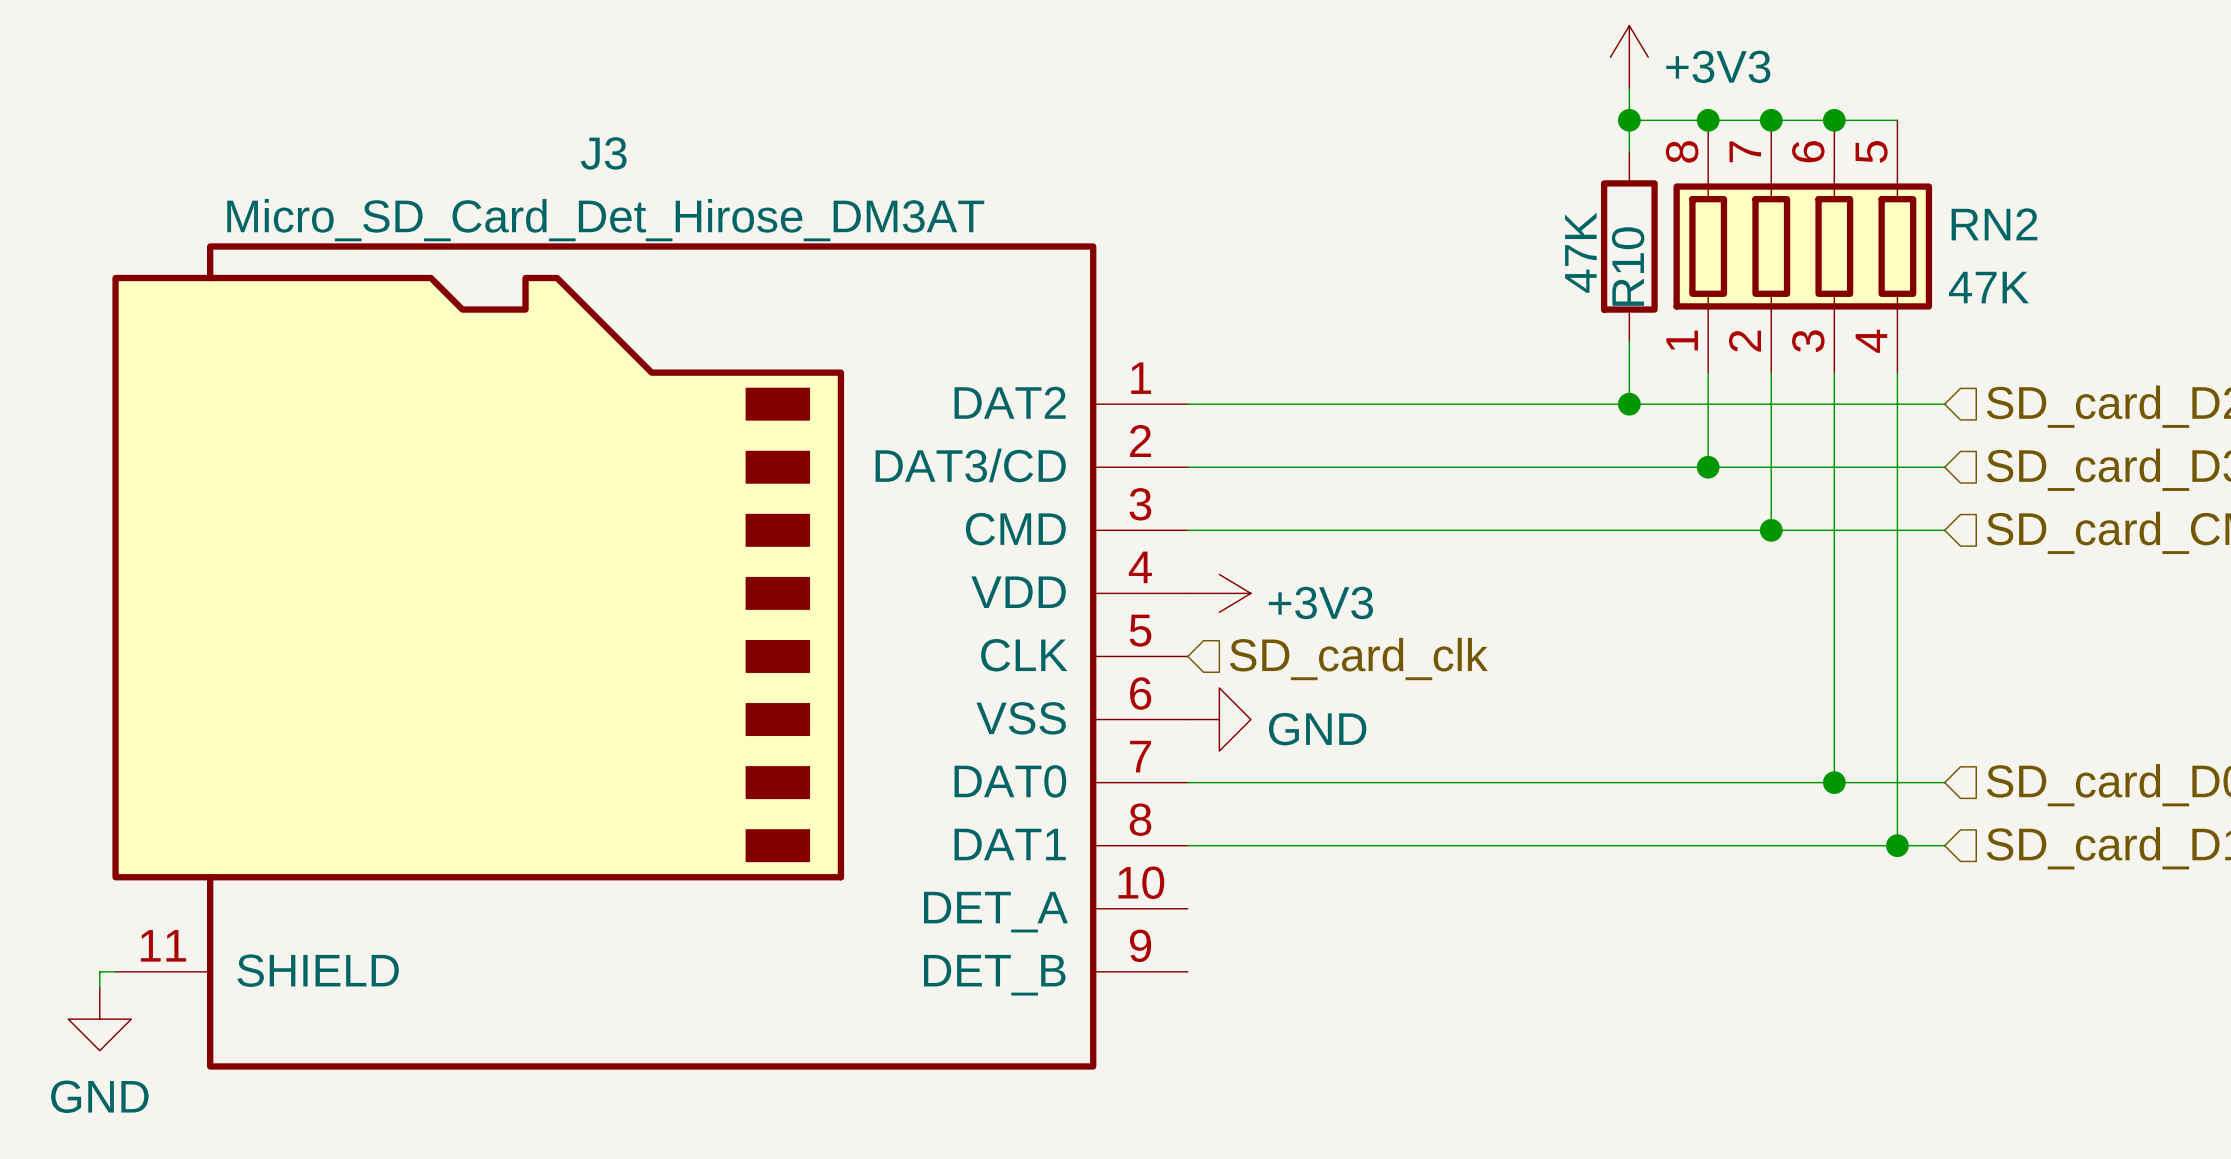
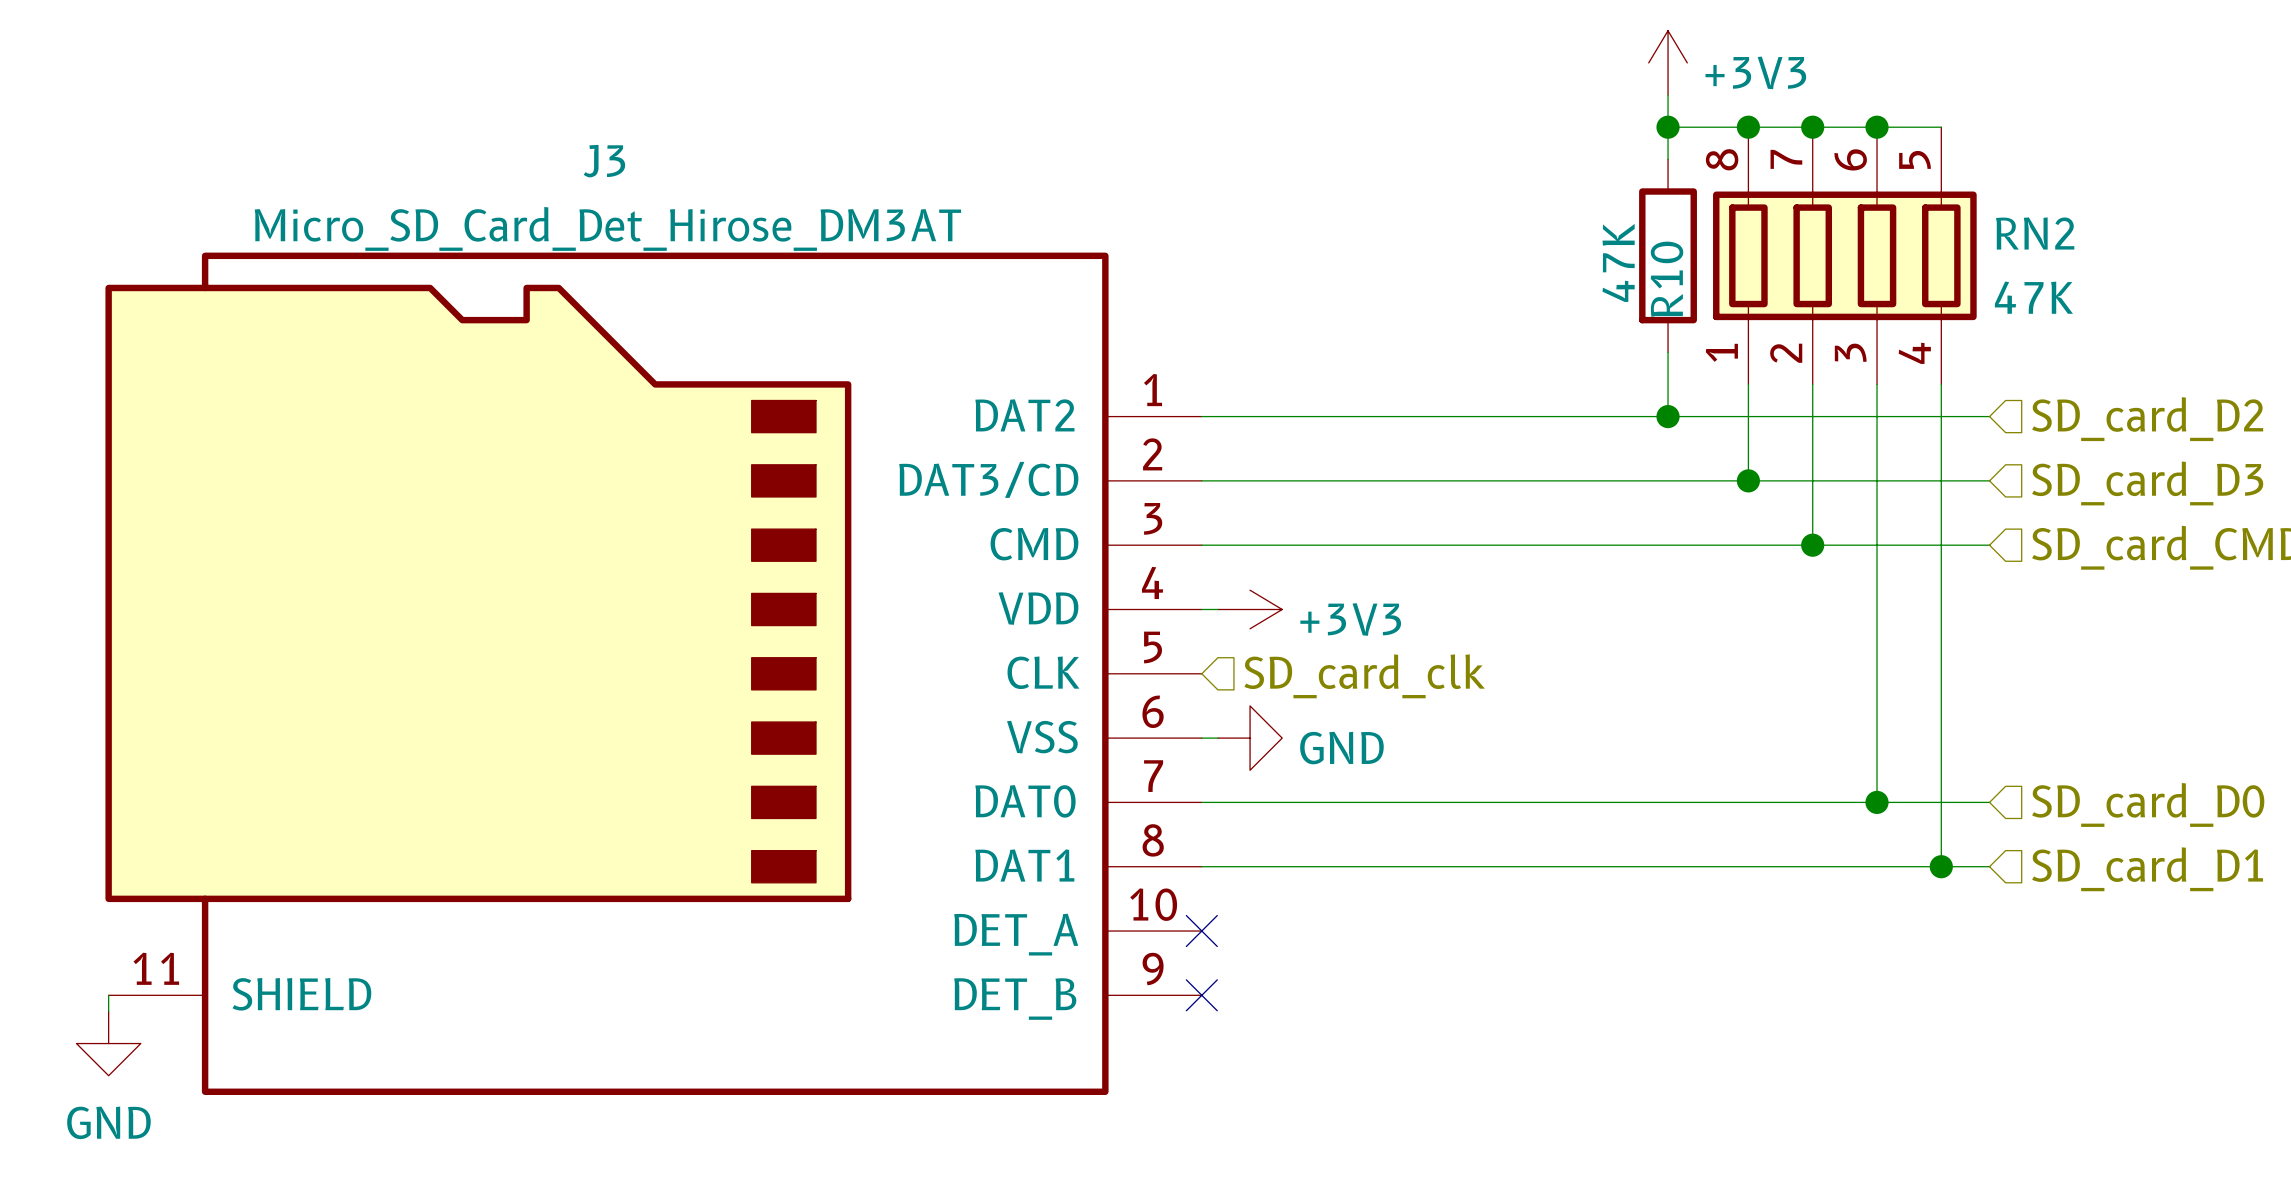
J3 position: (650, 656) -> (653, 673)
hierarchical label position: SD_card_clk (1358, 659) -> SD_card_clk (1364, 676)
no-connect mark: none -> (1201, 931)
no-connect mark: none -> (1201, 995)

